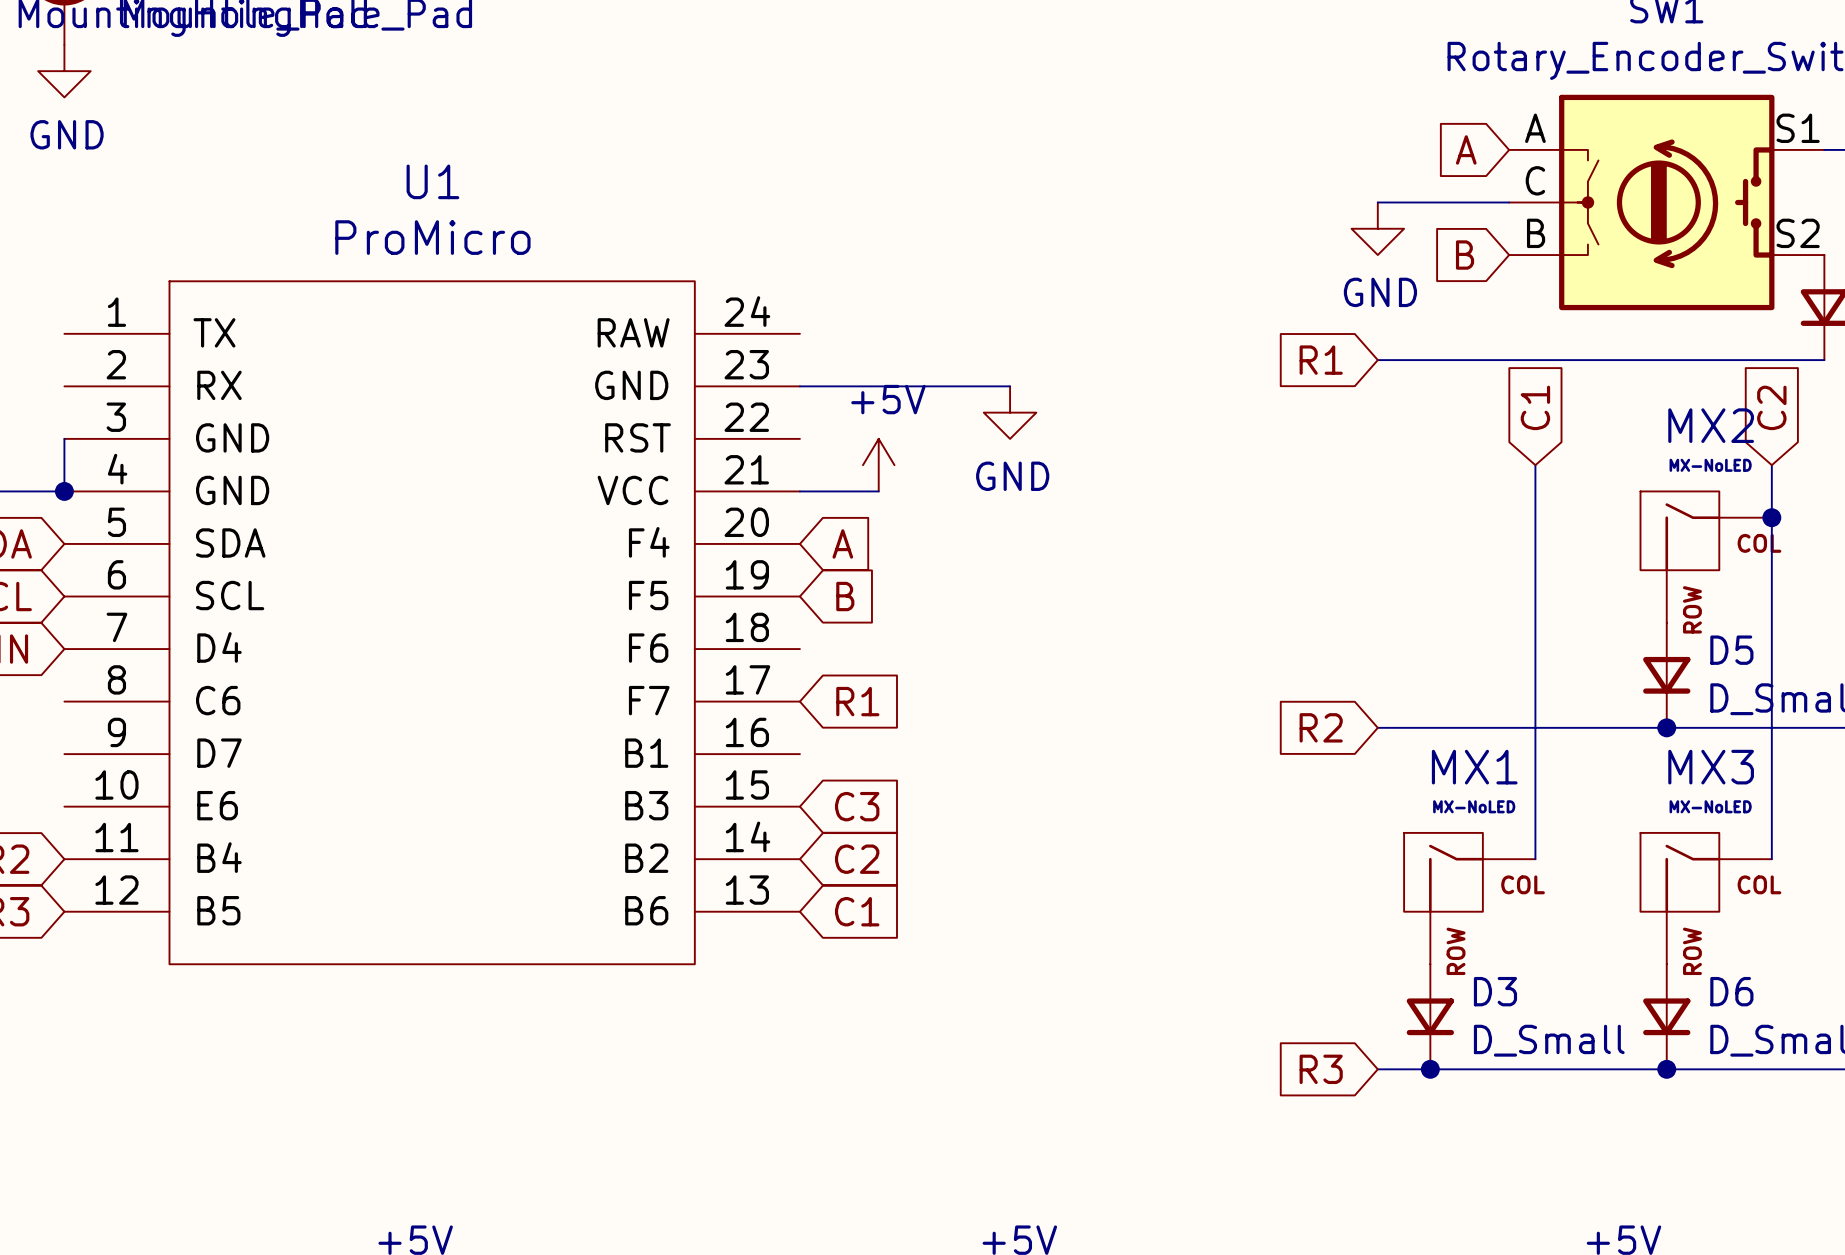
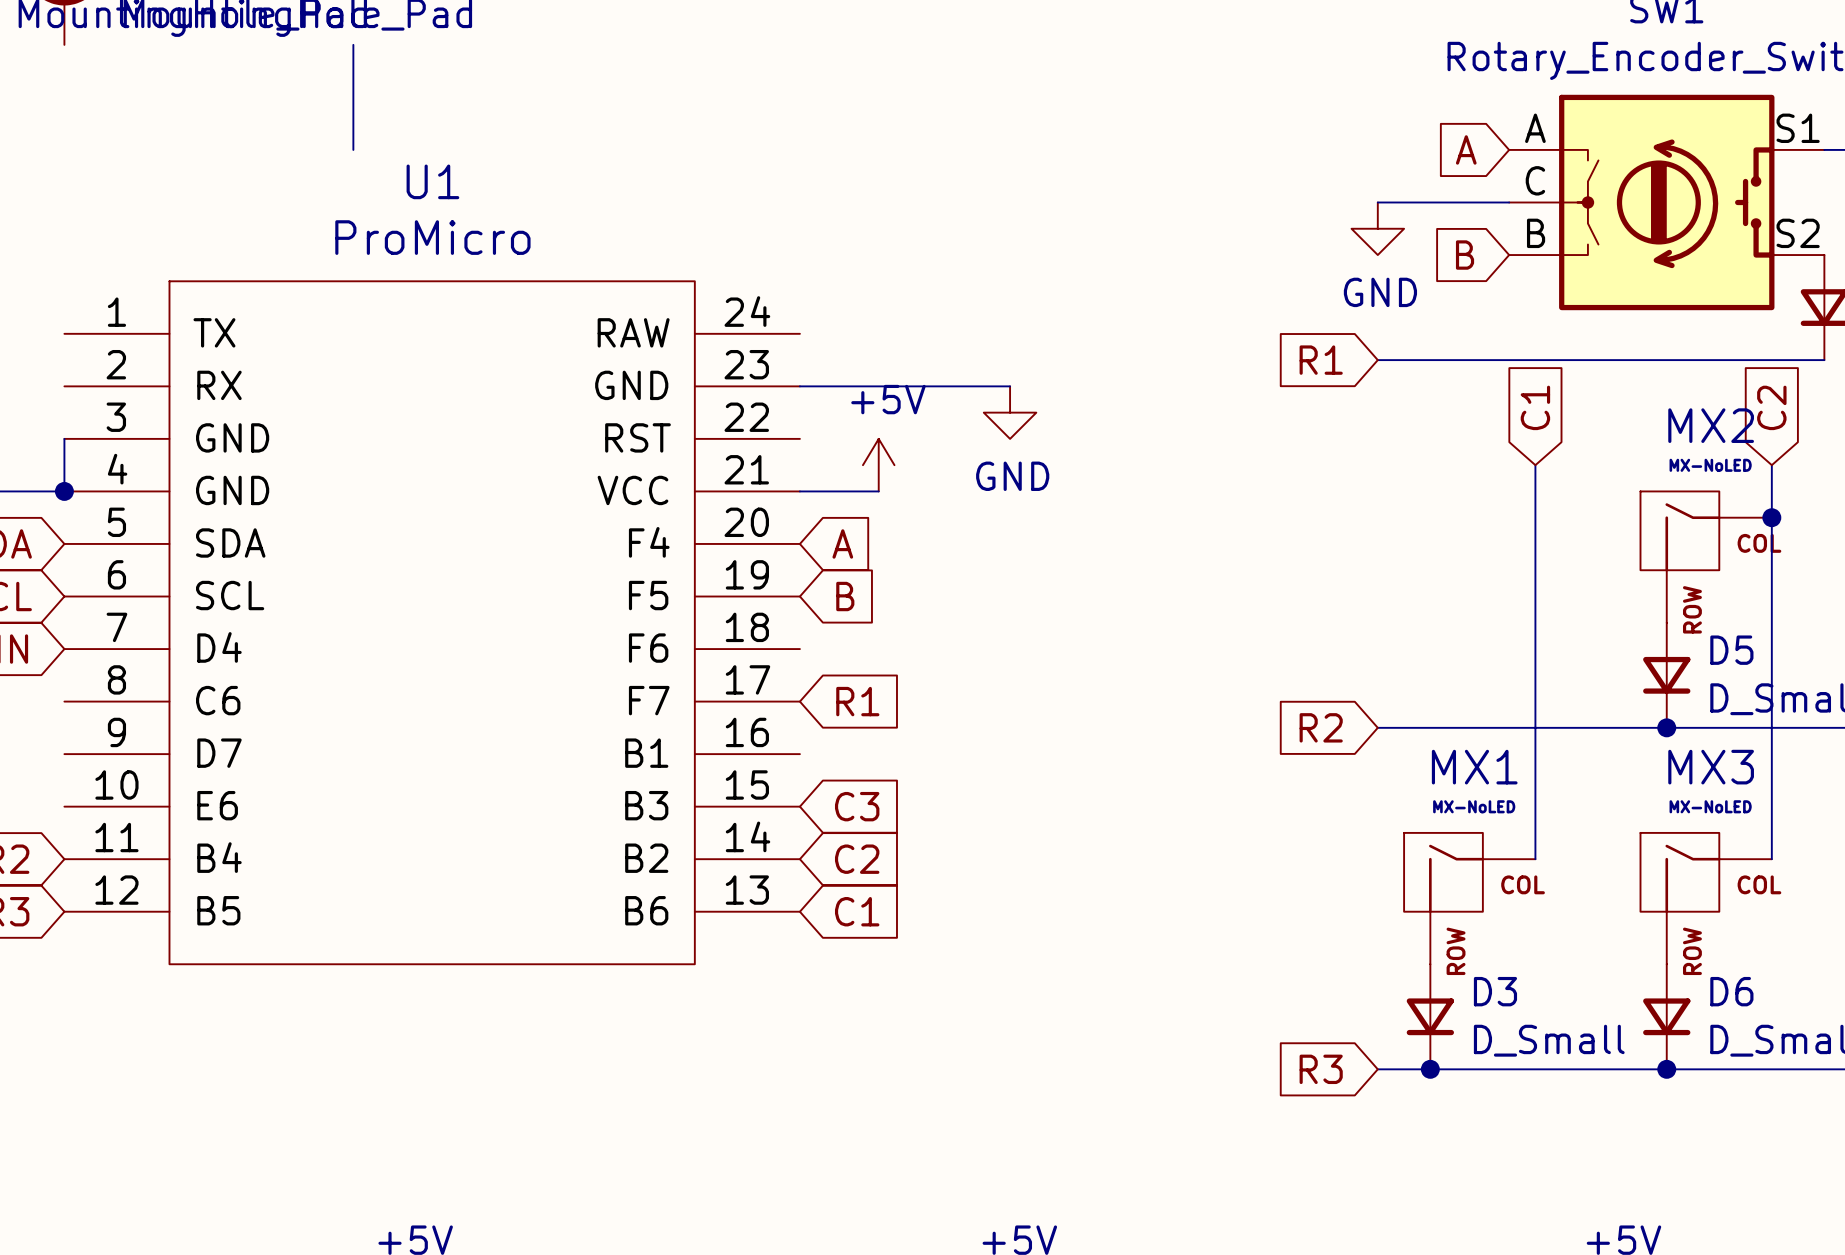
wire: none -> (353, 44) (353, 149)
power symbol: GND (64, 71) -> none

